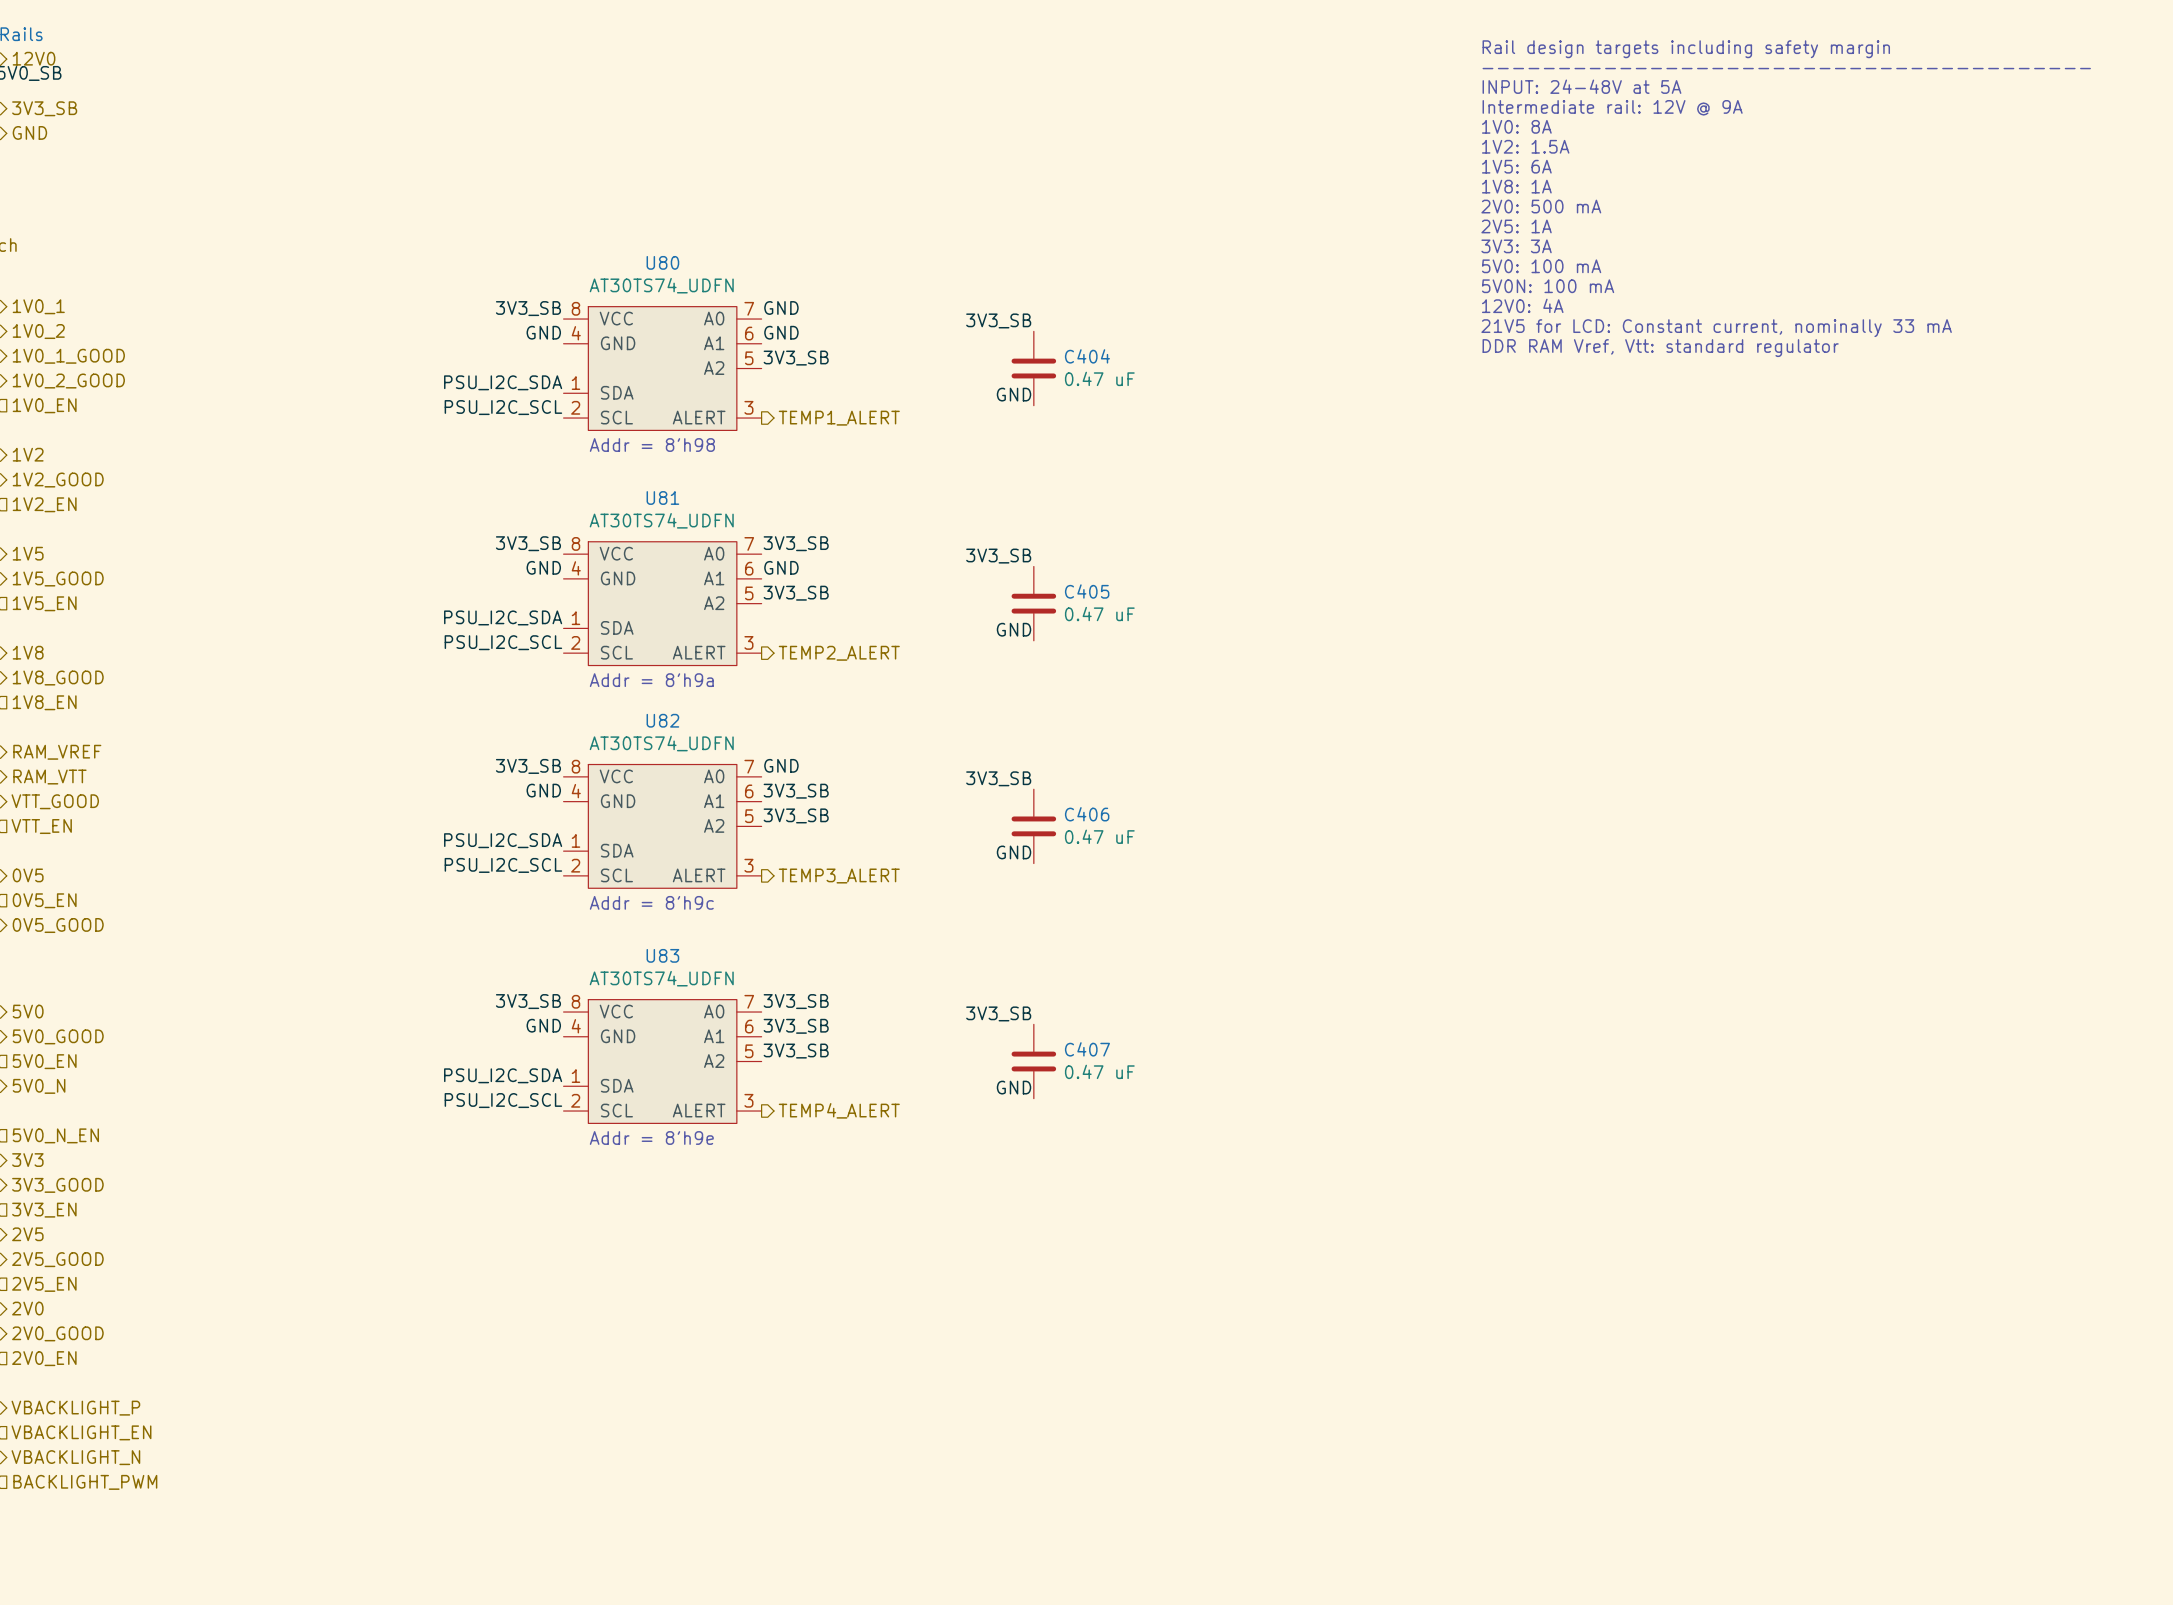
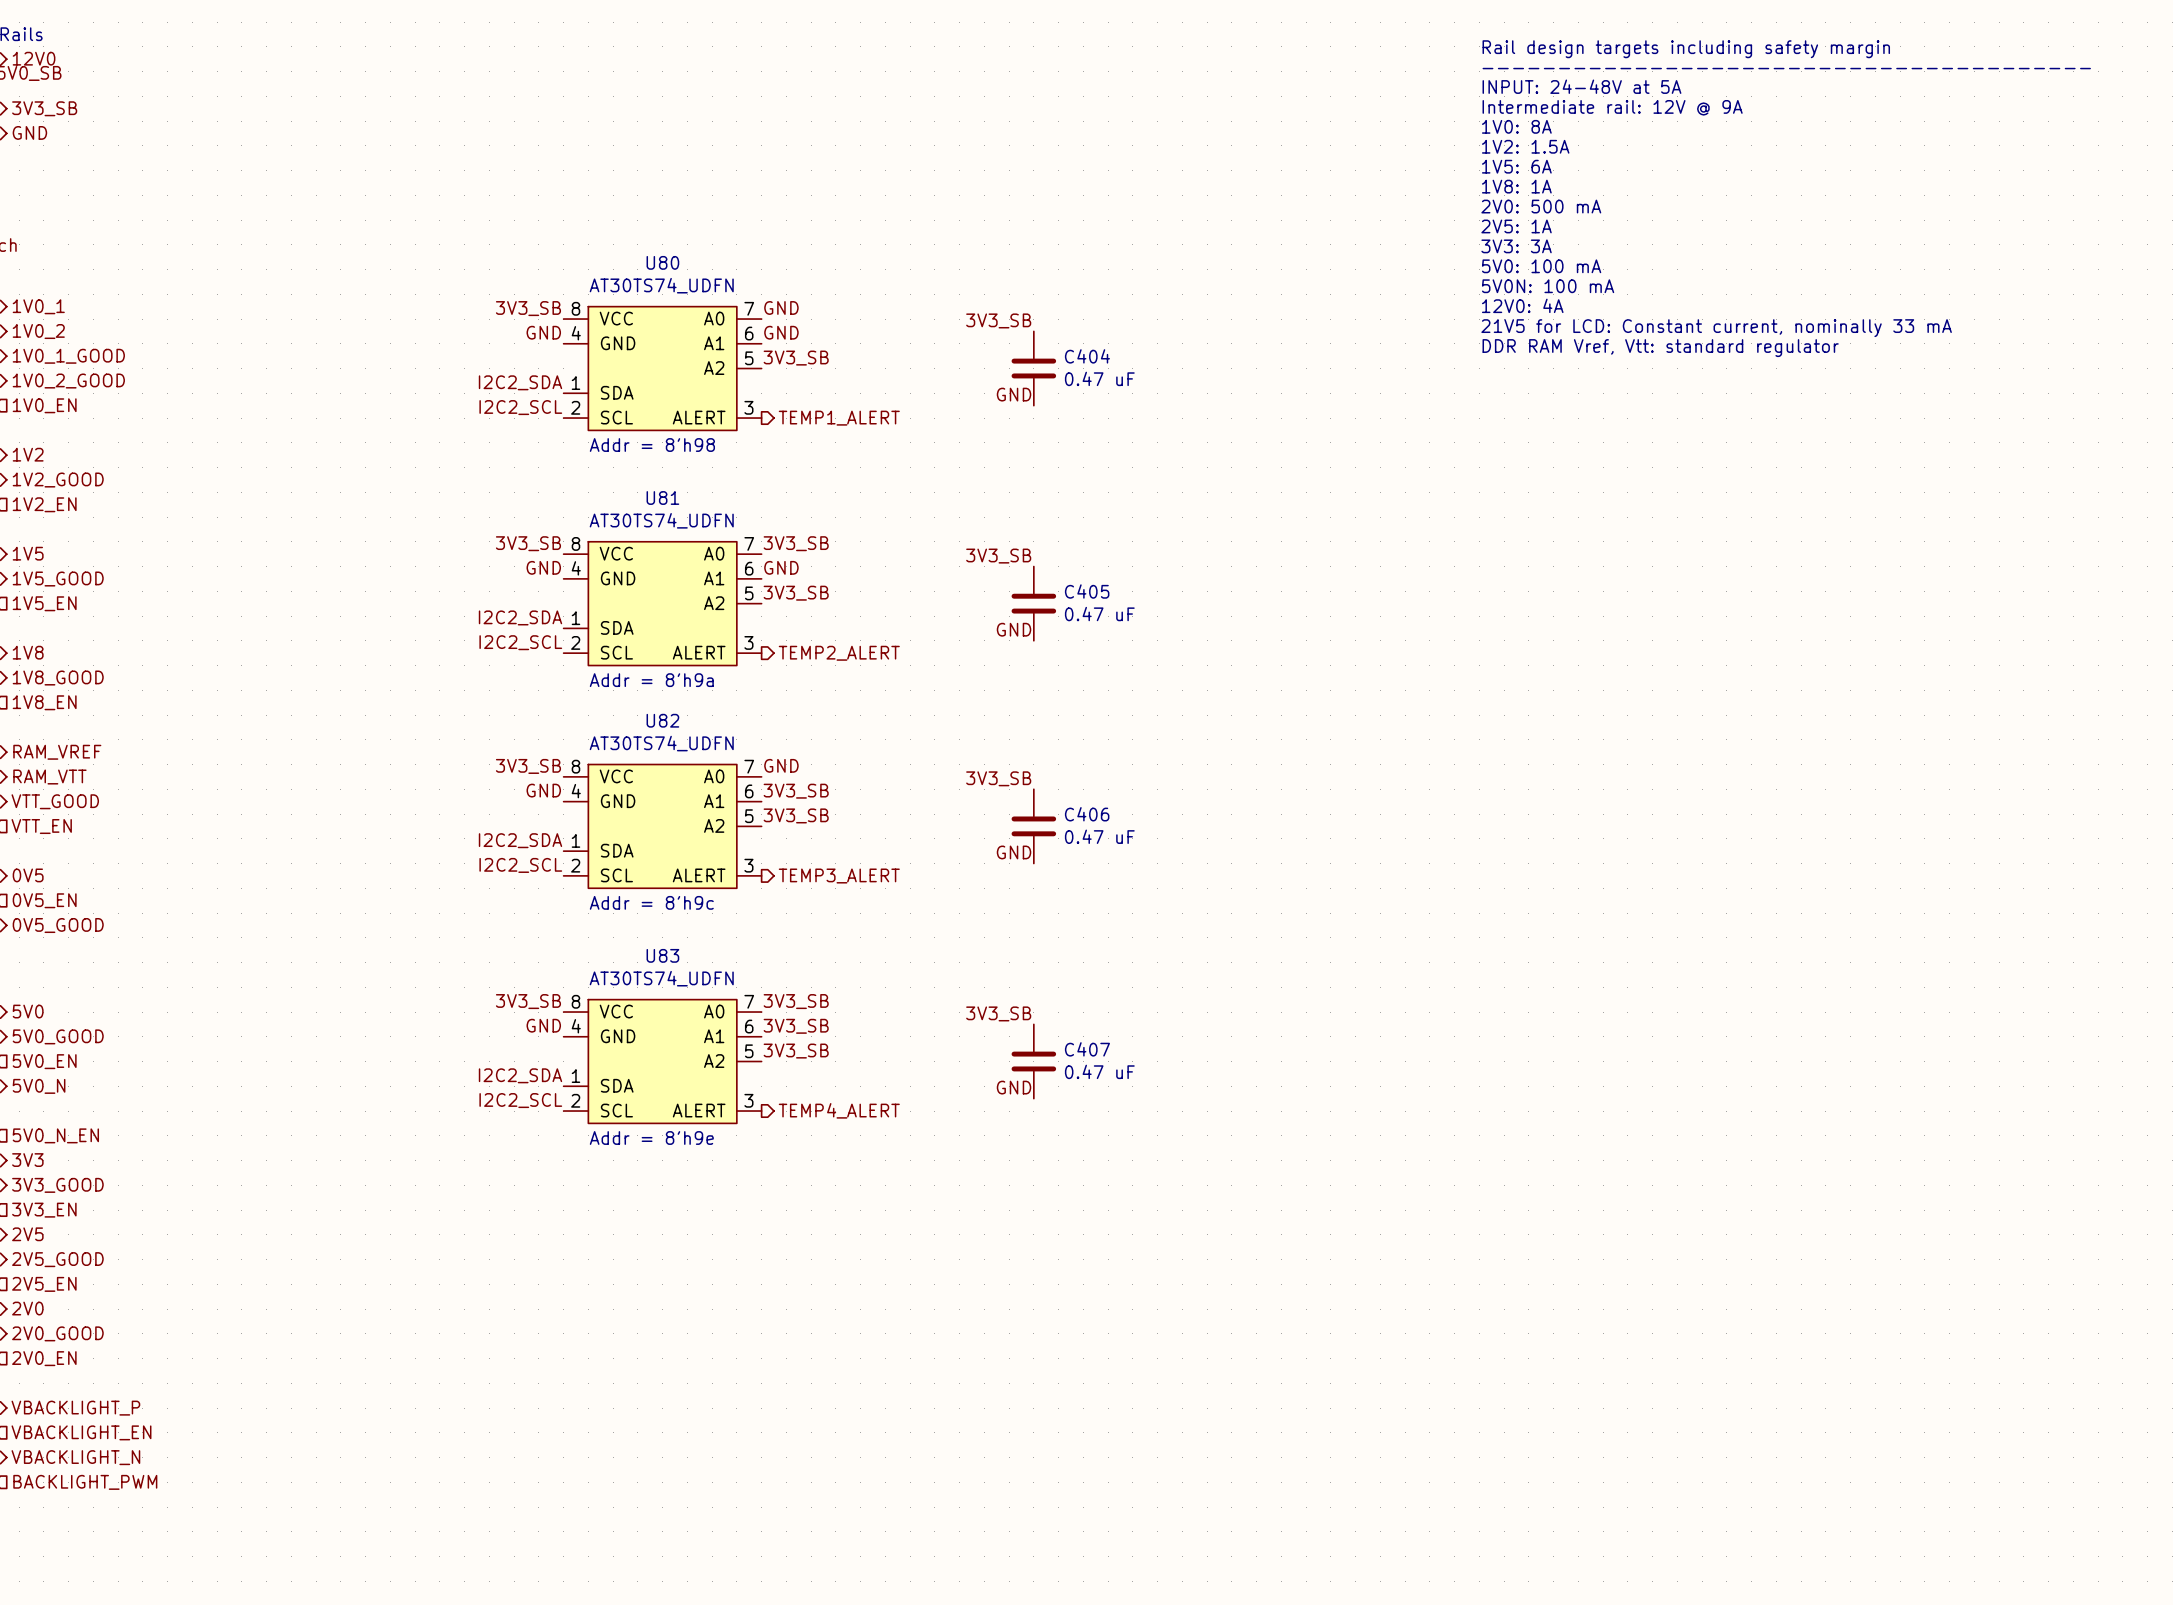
label: PSU_I2C_SDA (503, 382) -> I2C2_SDA (520, 382)
label: PSU_I2C_SCL (503, 407) -> I2C2_SCL (520, 407)
label: PSU_I2C_SDA (503, 617) -> I2C2_SDA (520, 617)
label: PSU_I2C_SCL (503, 642) -> I2C2_SCL (520, 642)
label: PSU_I2C_SDA (503, 840) -> I2C2_SDA (520, 840)
label: PSU_I2C_SCL (503, 865) -> I2C2_SCL (520, 865)
label: PSU_I2C_SDA (503, 1075) -> I2C2_SDA (520, 1075)
label: PSU_I2C_SCL (503, 1100) -> I2C2_SCL (520, 1100)

